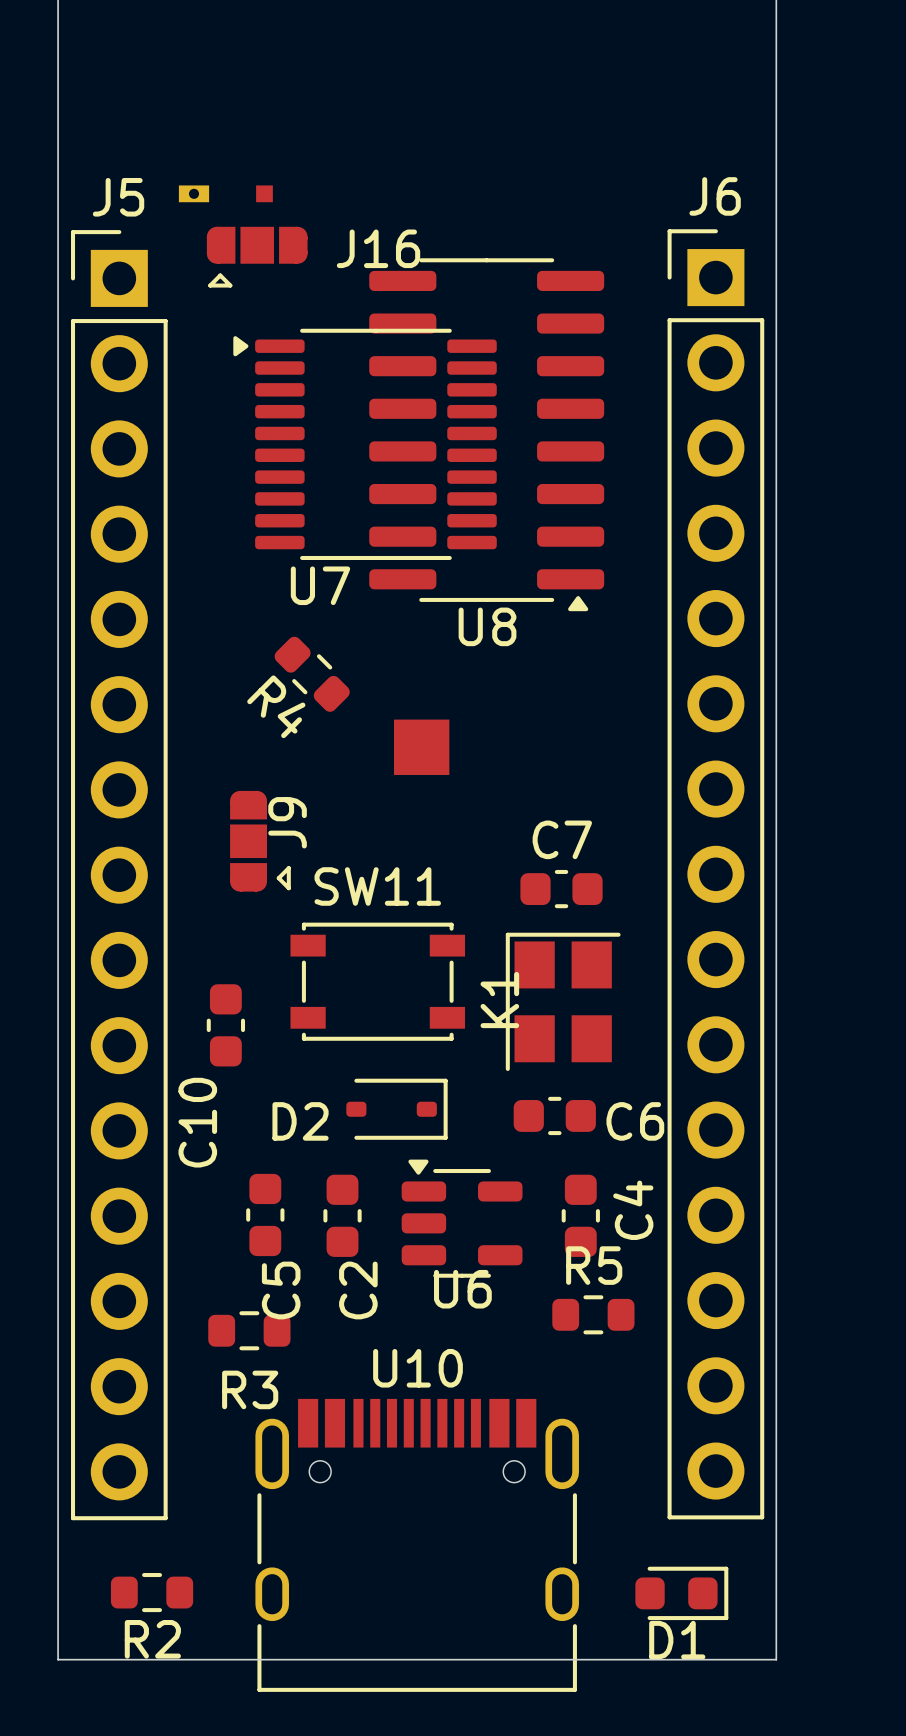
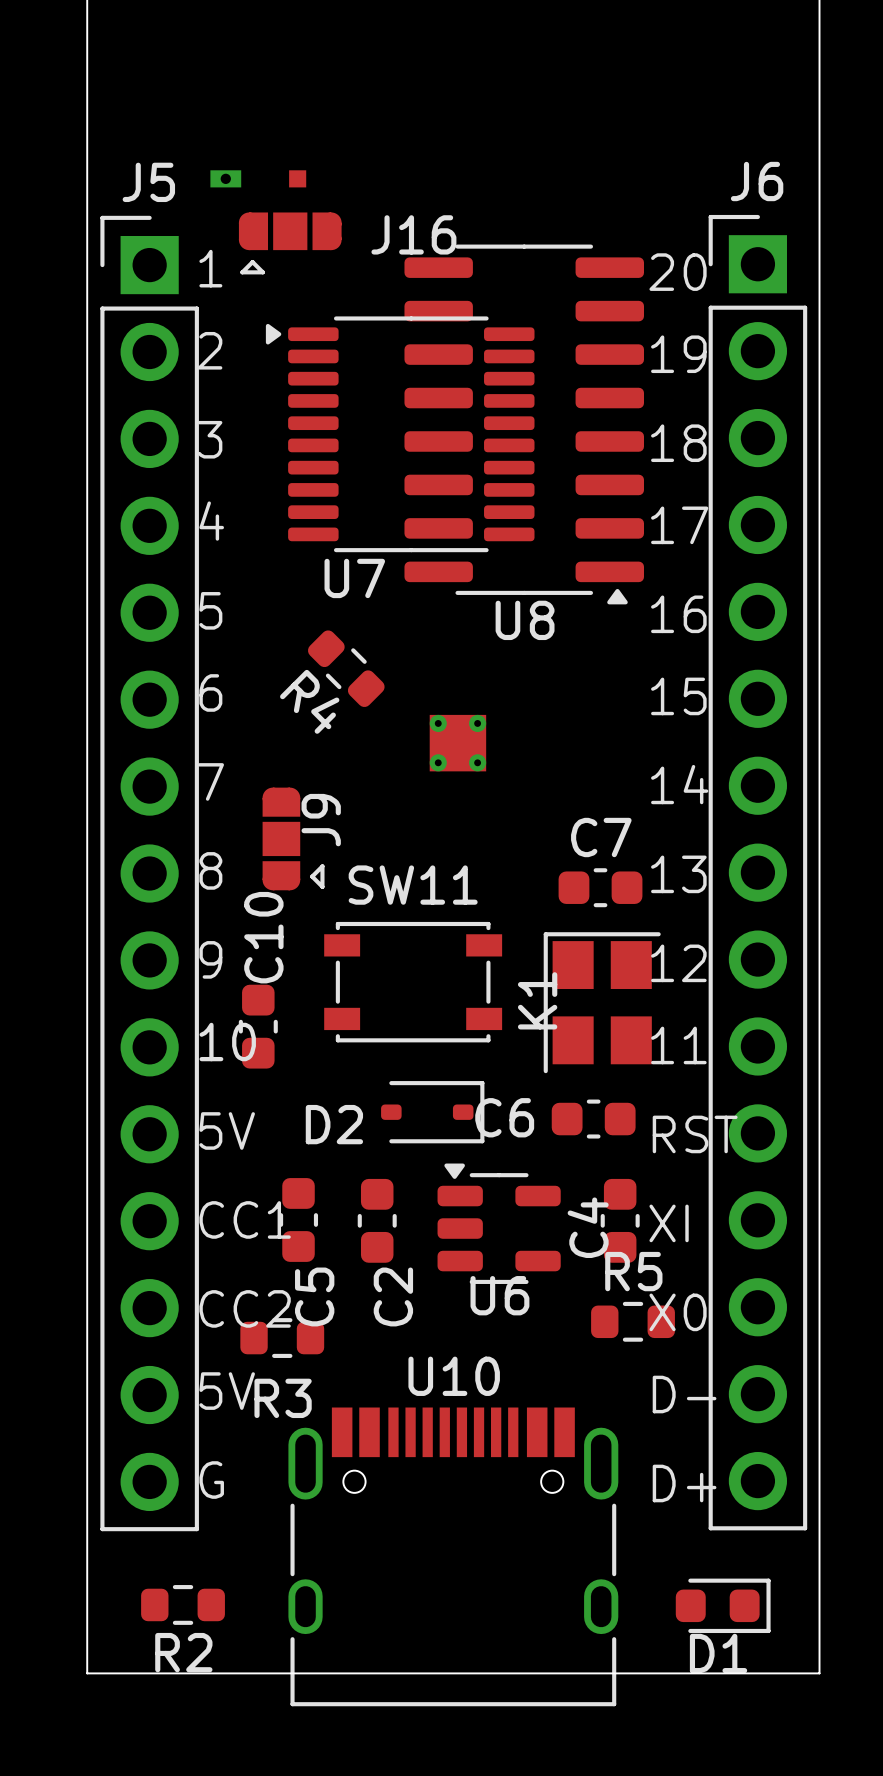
text: none -> 1 (210, 268)
text: none -> 20 (678, 272)
text: none -> 2 (210, 350)
text: none -> 19 (678, 354)
text: none -> 3 (210, 439)
text: none -> 18 (678, 443)
text: none -> 4 (211, 521)
text: none -> 17 (679, 525)
text: none -> 5 (210, 610)
text: none -> 16 (678, 614)
text: none -> 6 (210, 692)
text: none -> 15 (678, 696)
part footprint: [393, 719, 450, 775] -> [429, 714, 487, 772]
text: none -> 7 (210, 781)
text: none -> 14 (679, 784)
text: none -> 8 (210, 870)
text: none -> 13 (678, 874)
text: none -> 9 (210, 959)
text: none -> 12 (678, 963)
text: none -> 10 (227, 1042)
text: none -> 11 (678, 1045)
C6 name position: C6 (635, 1121) -> C6 (504, 1117)
C10 name position: C10 (197, 1122) -> C10 (263, 937)
text: none -> 5V (227, 1130)
text: none -> RST (695, 1134)
C4 name position: C4 (633, 1210) -> C4 (588, 1227)
text: none -> CC1 (245, 1219)
text: none -> XI (669, 1223)
text: none -> CC2 (245, 1308)
text: none -> X0 (678, 1312)
text: none -> 5V (227, 1391)
text: none -> D- (684, 1394)
text: none -> G (211, 1480)
text: none -> D+ (684, 1483)

